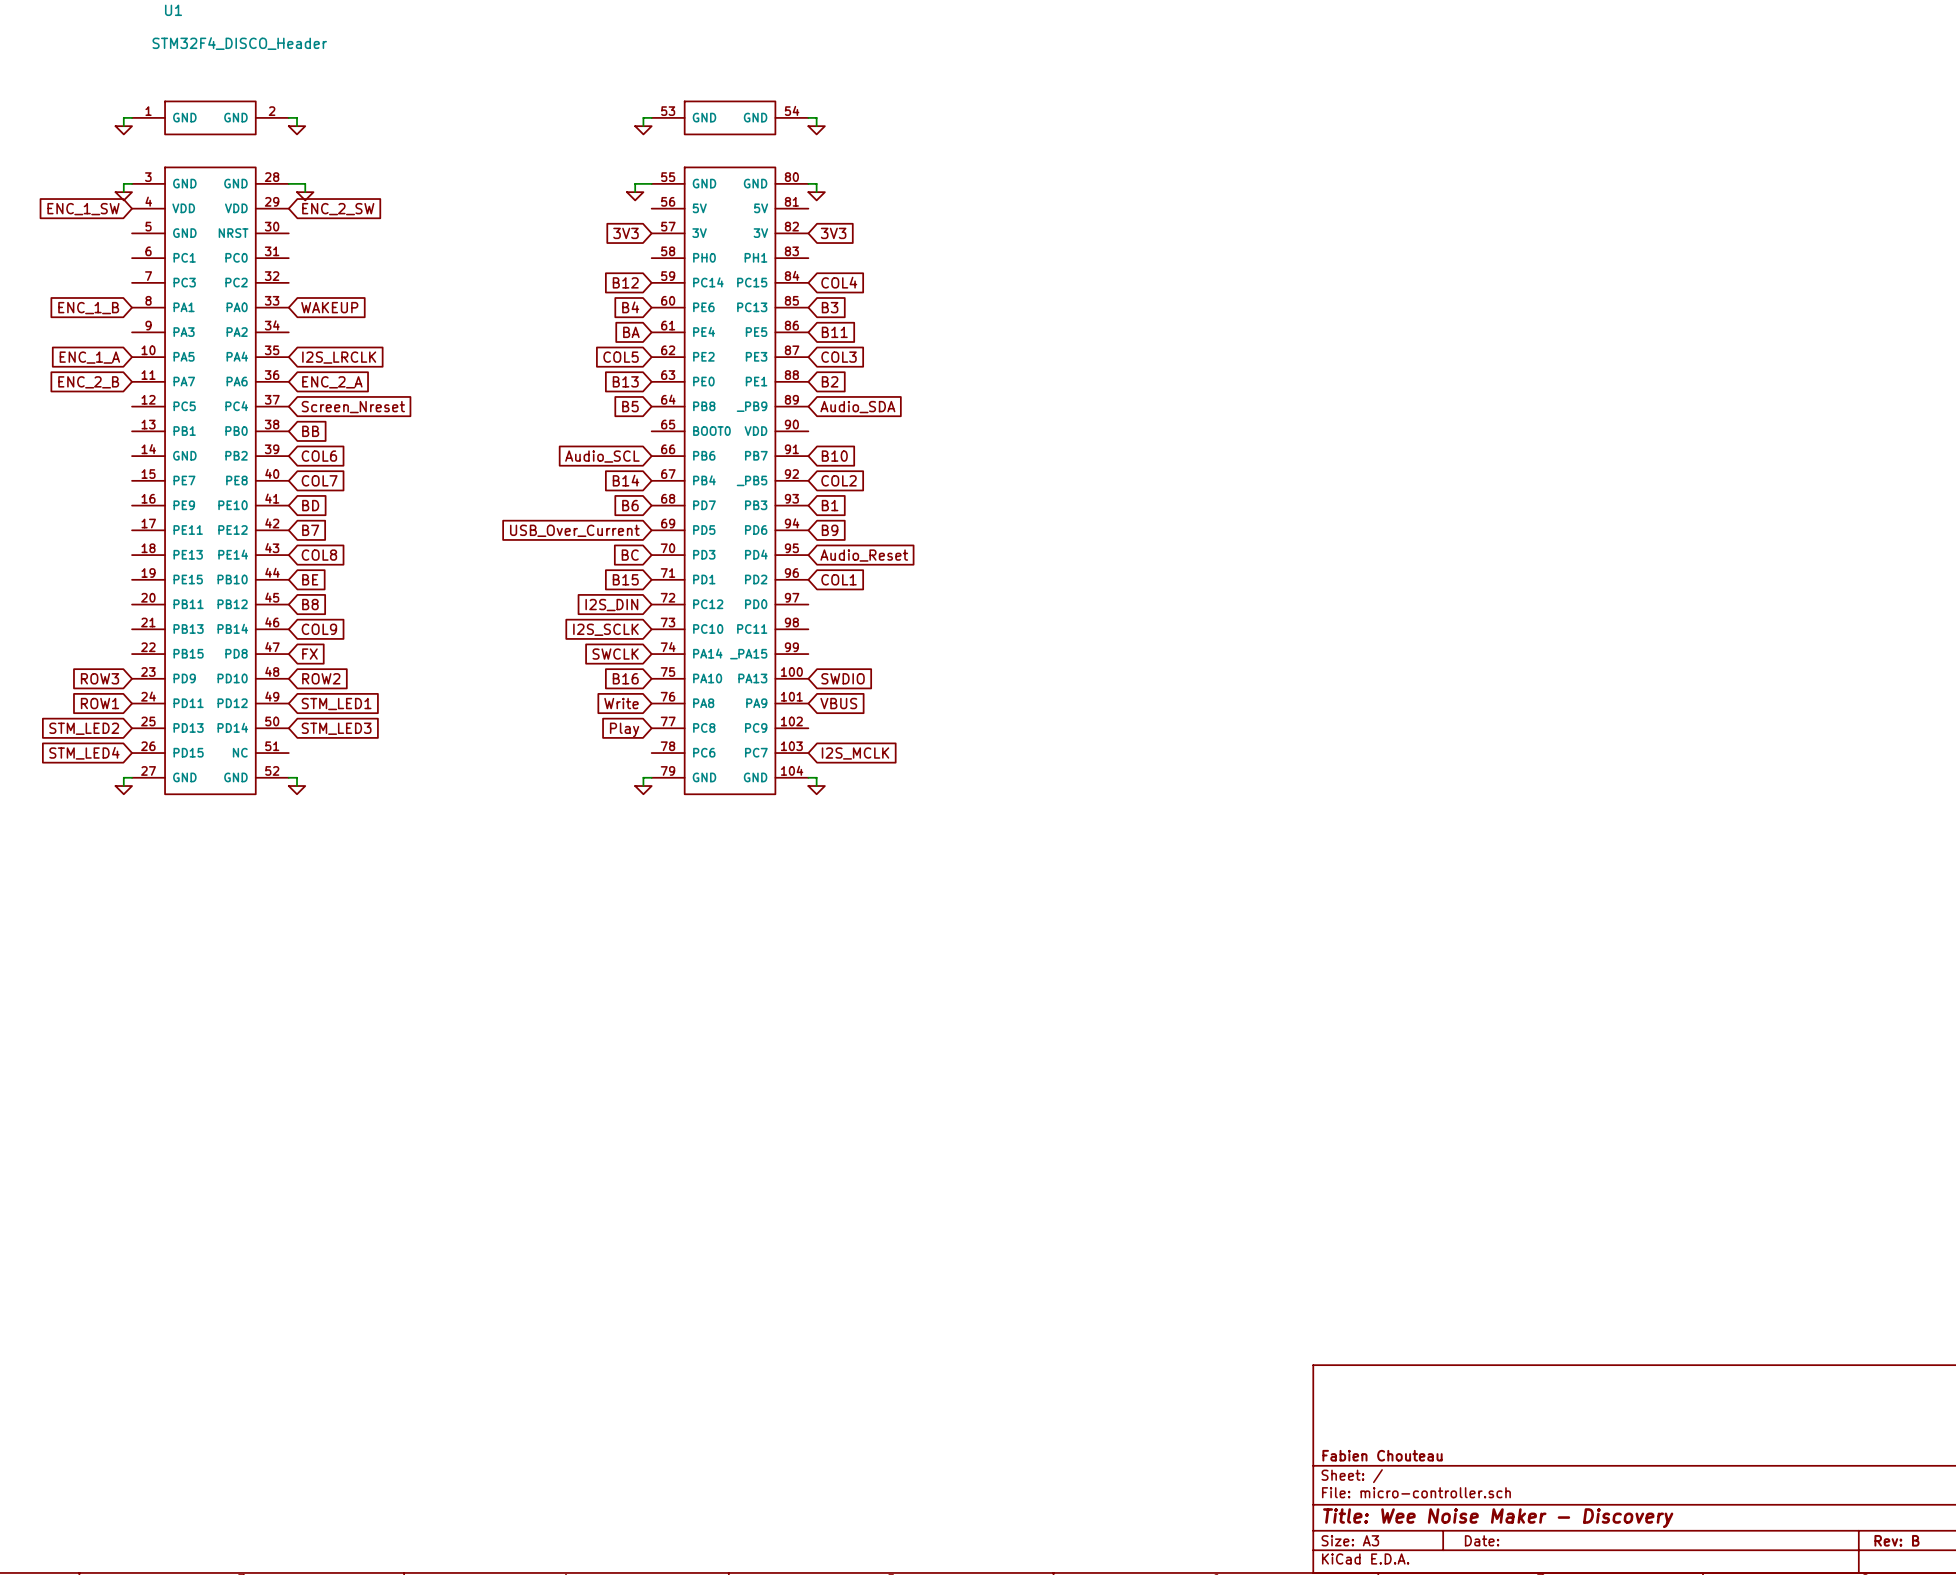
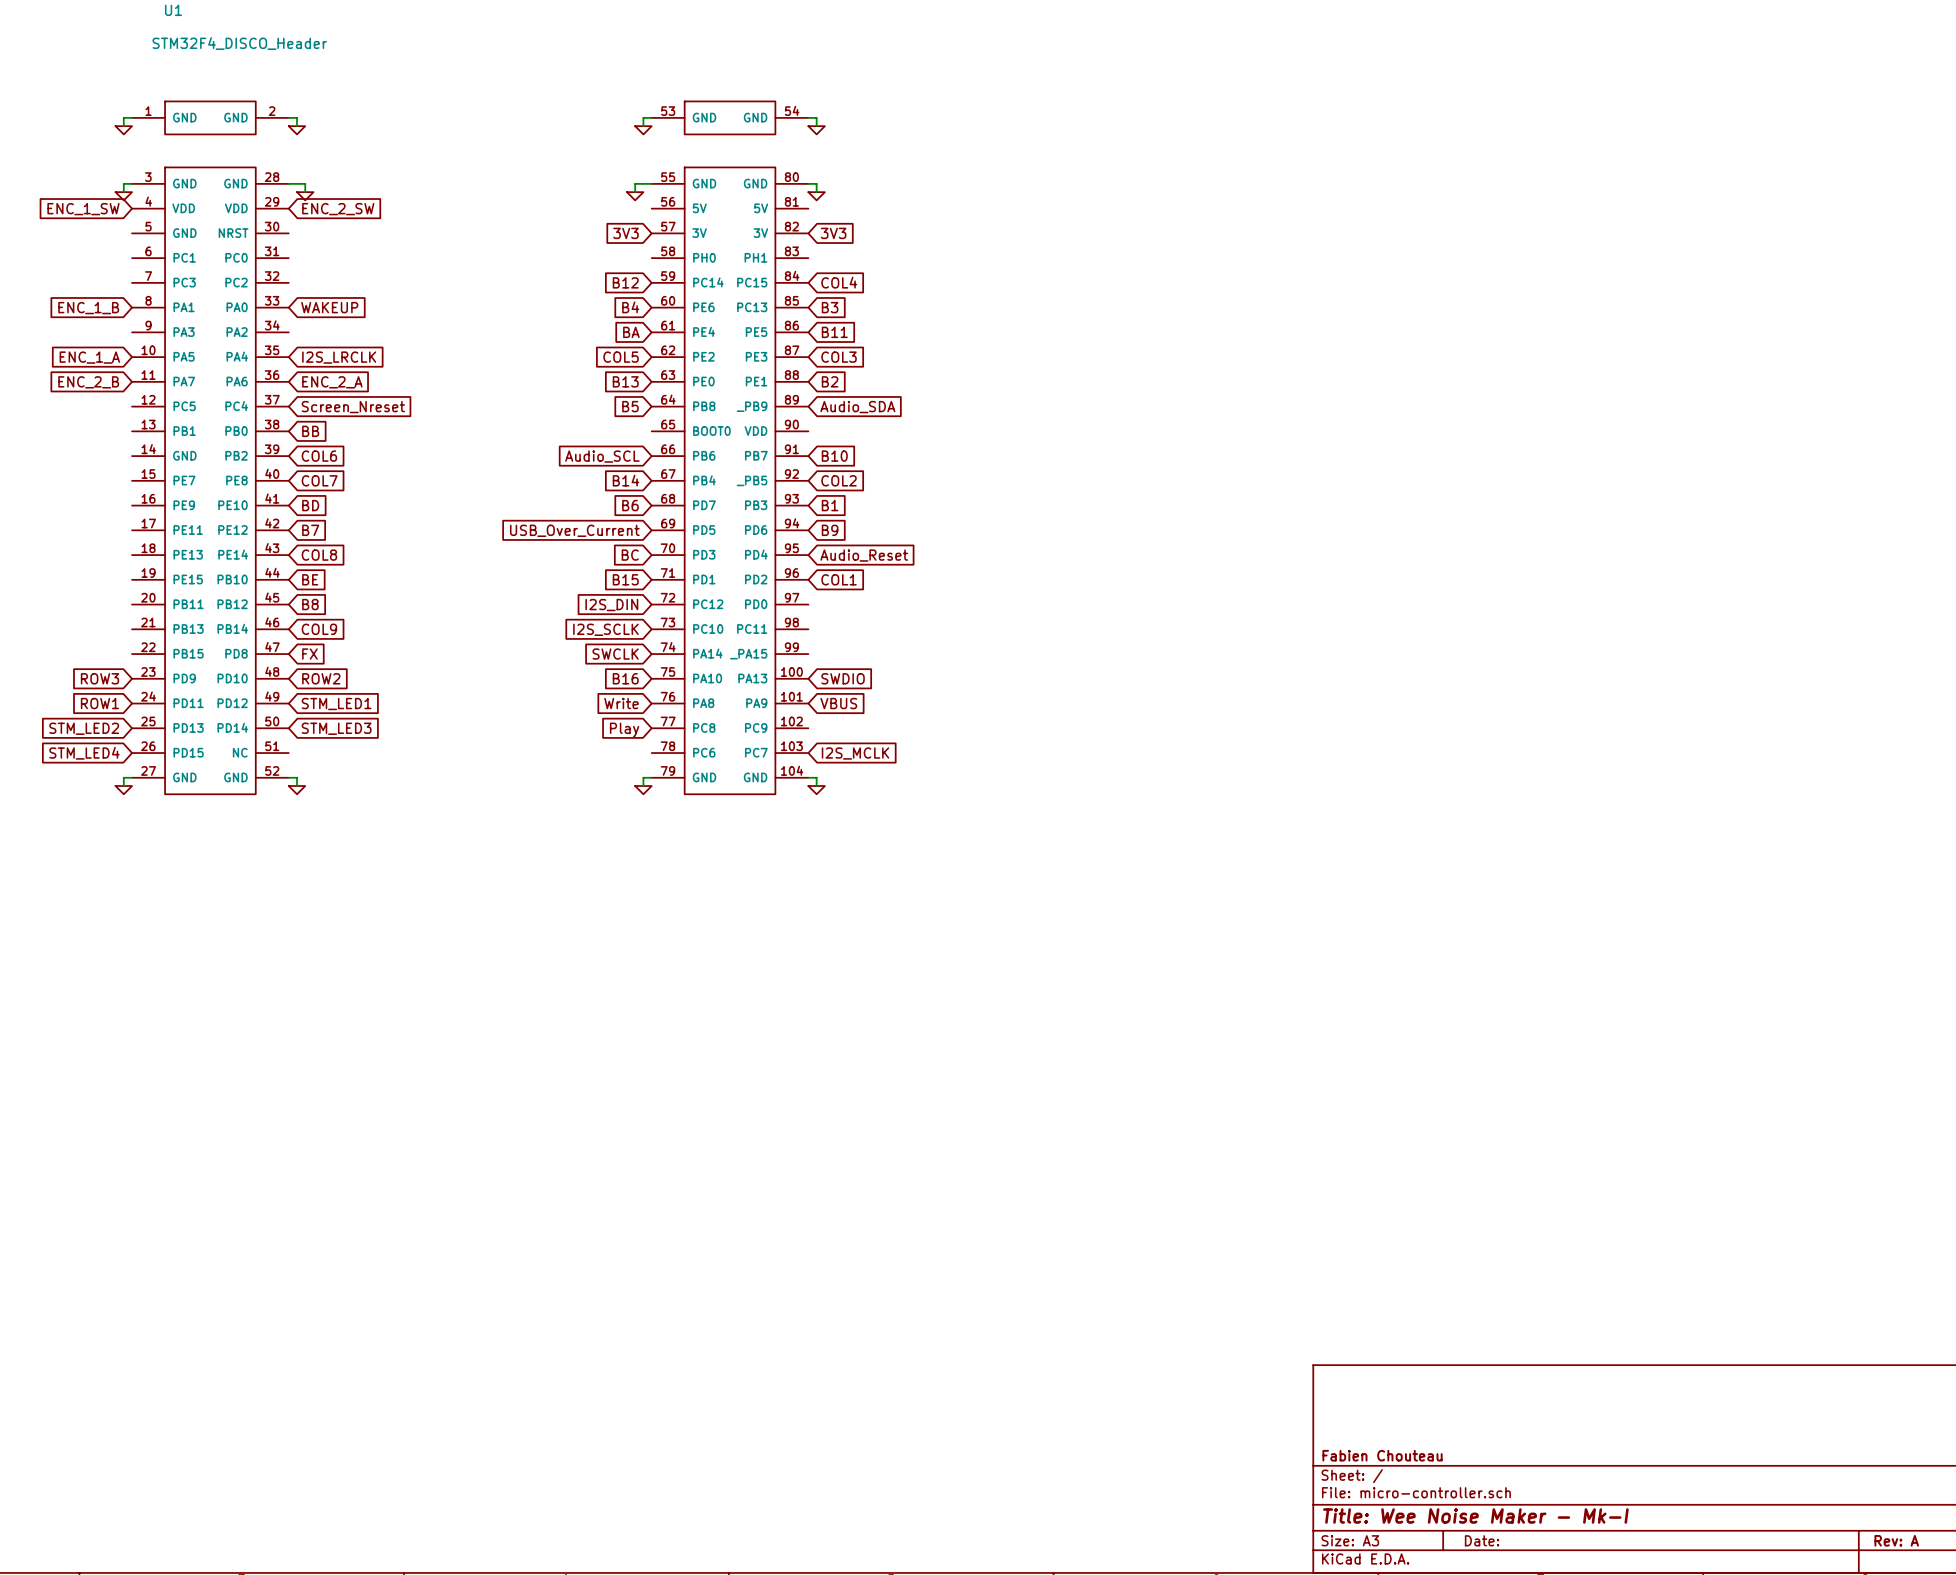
title block: Title: Wee Noise Maker - Discovery (1498, 1518) -> Title: Wee Noise Maker - Mk-I (1475, 1515)
title block: Rev: B (1896, 1540) -> Rev: A (1896, 1540)

